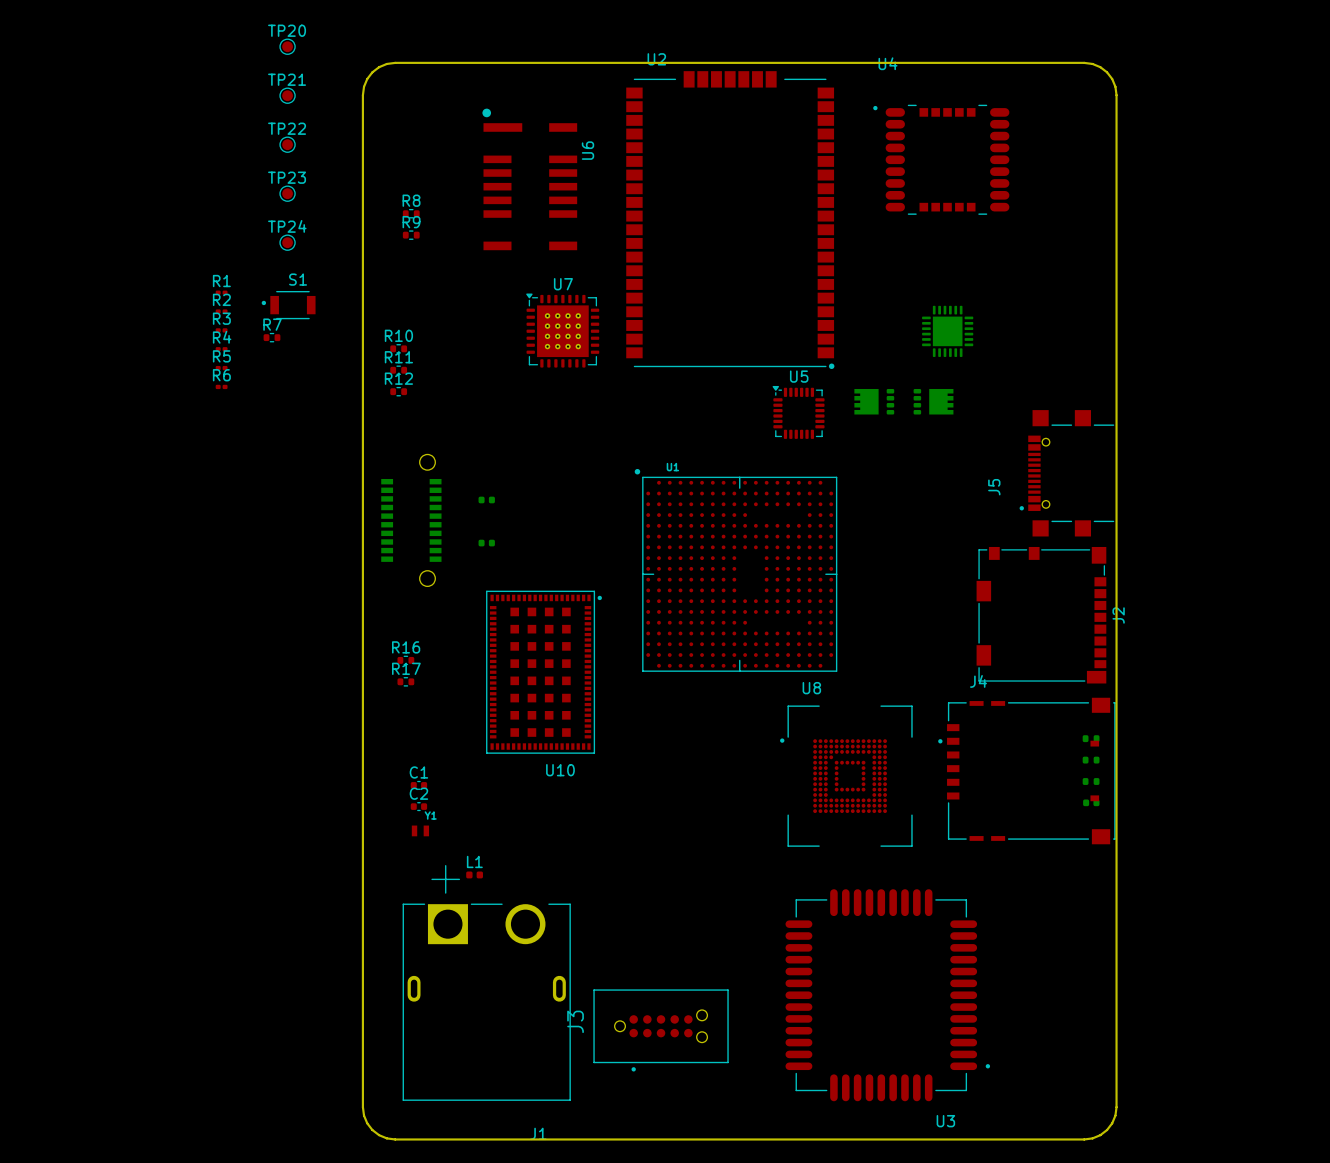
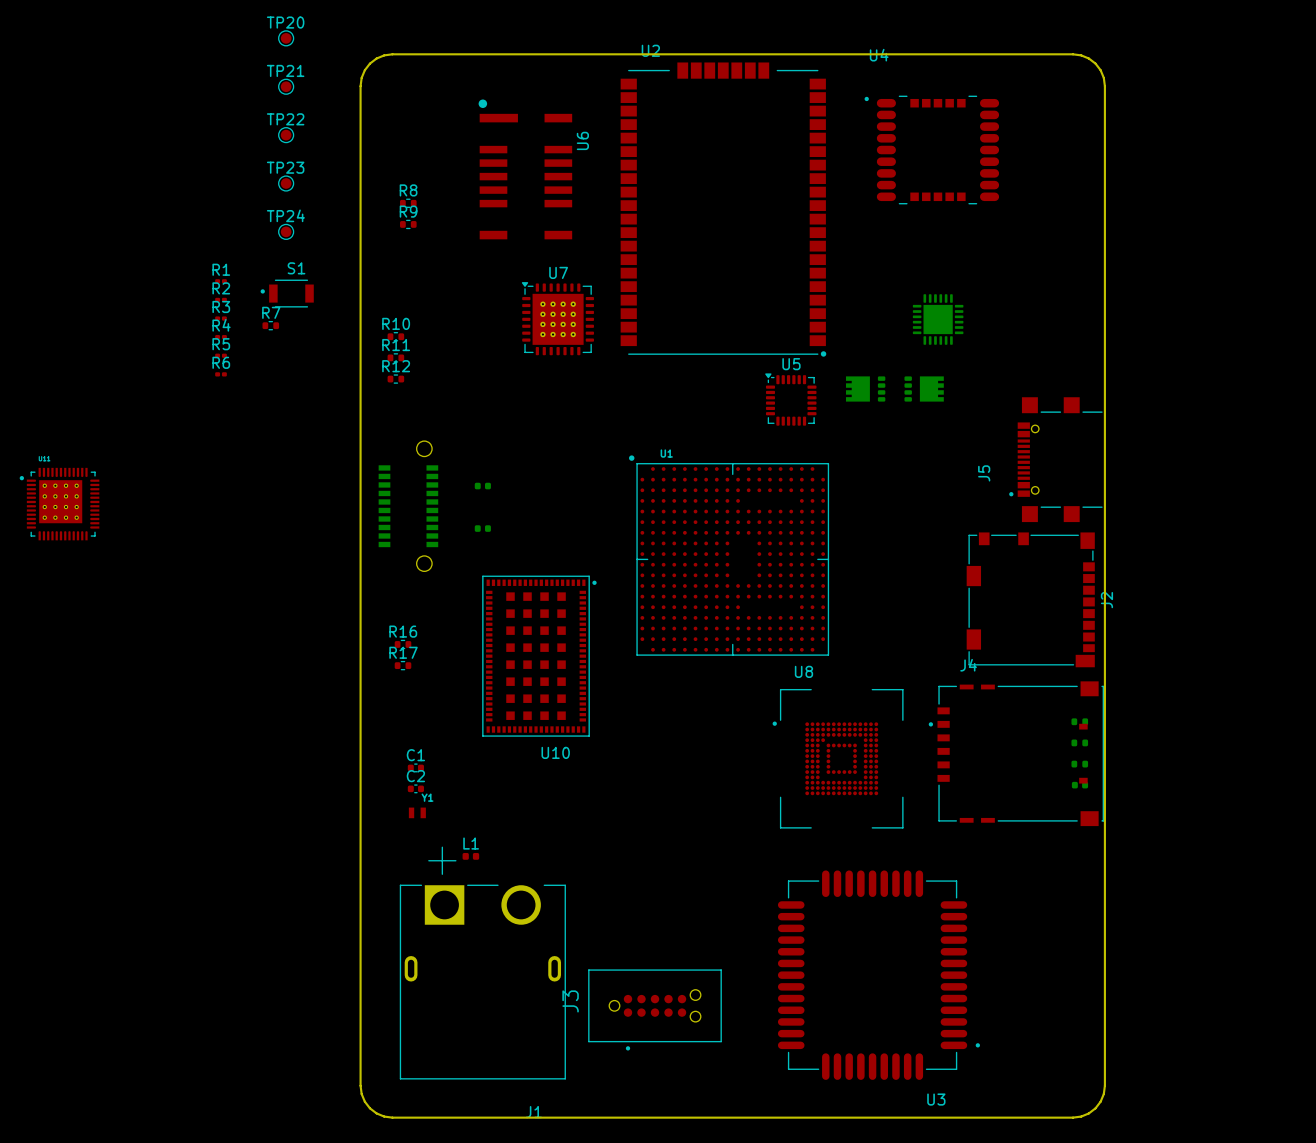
part: none -> (59, 504)

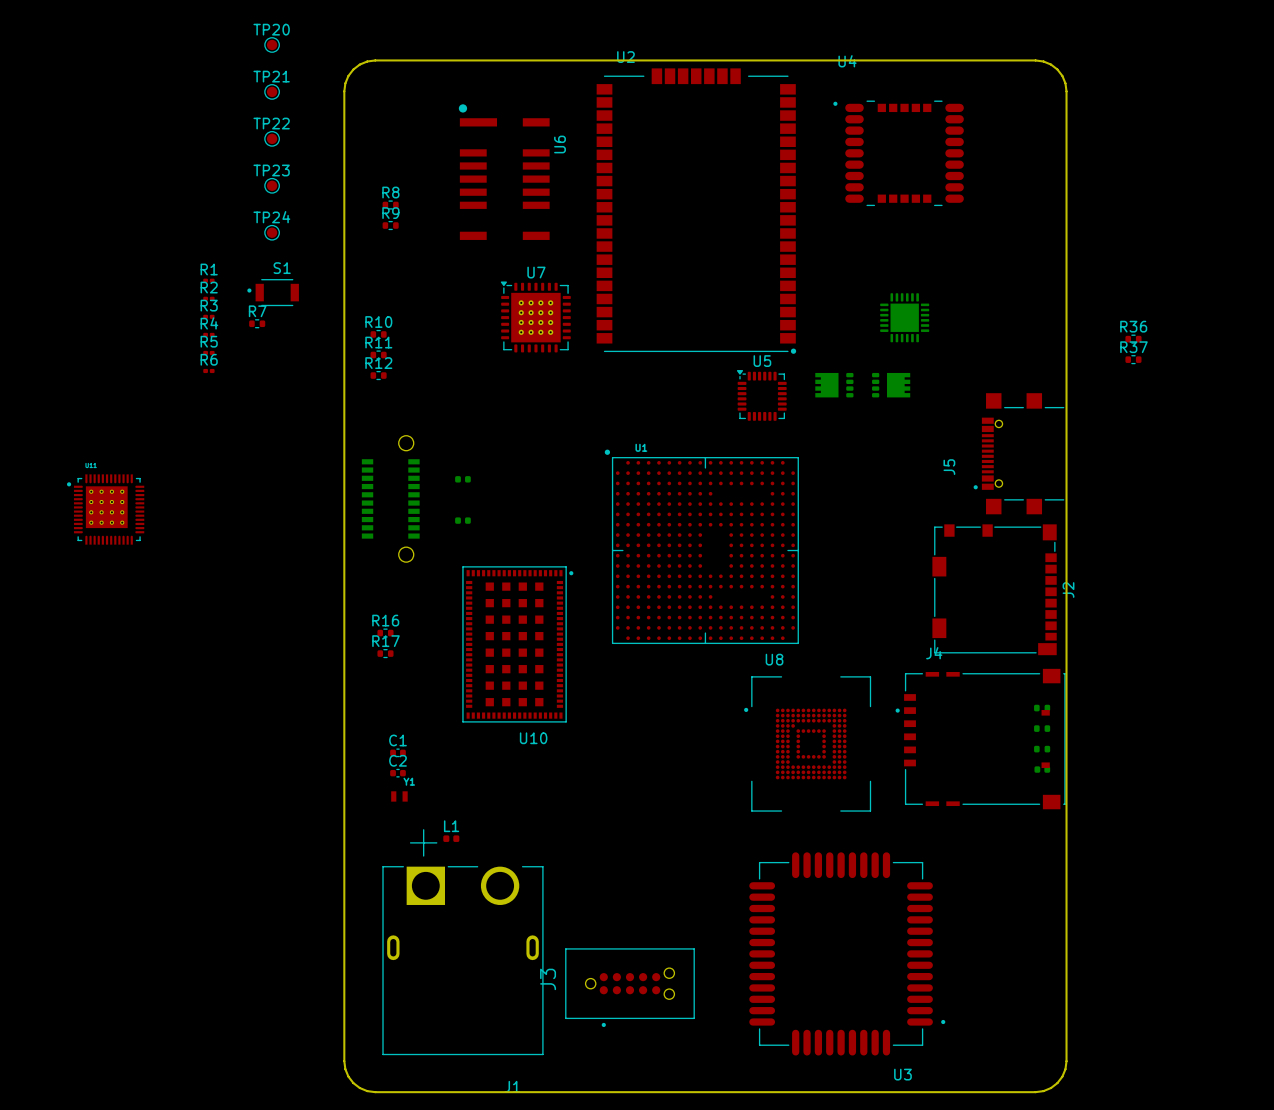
R36: none -> (1133, 339)
R37: none -> (1133, 359)
part position: (59, 504) -> (105, 509)

